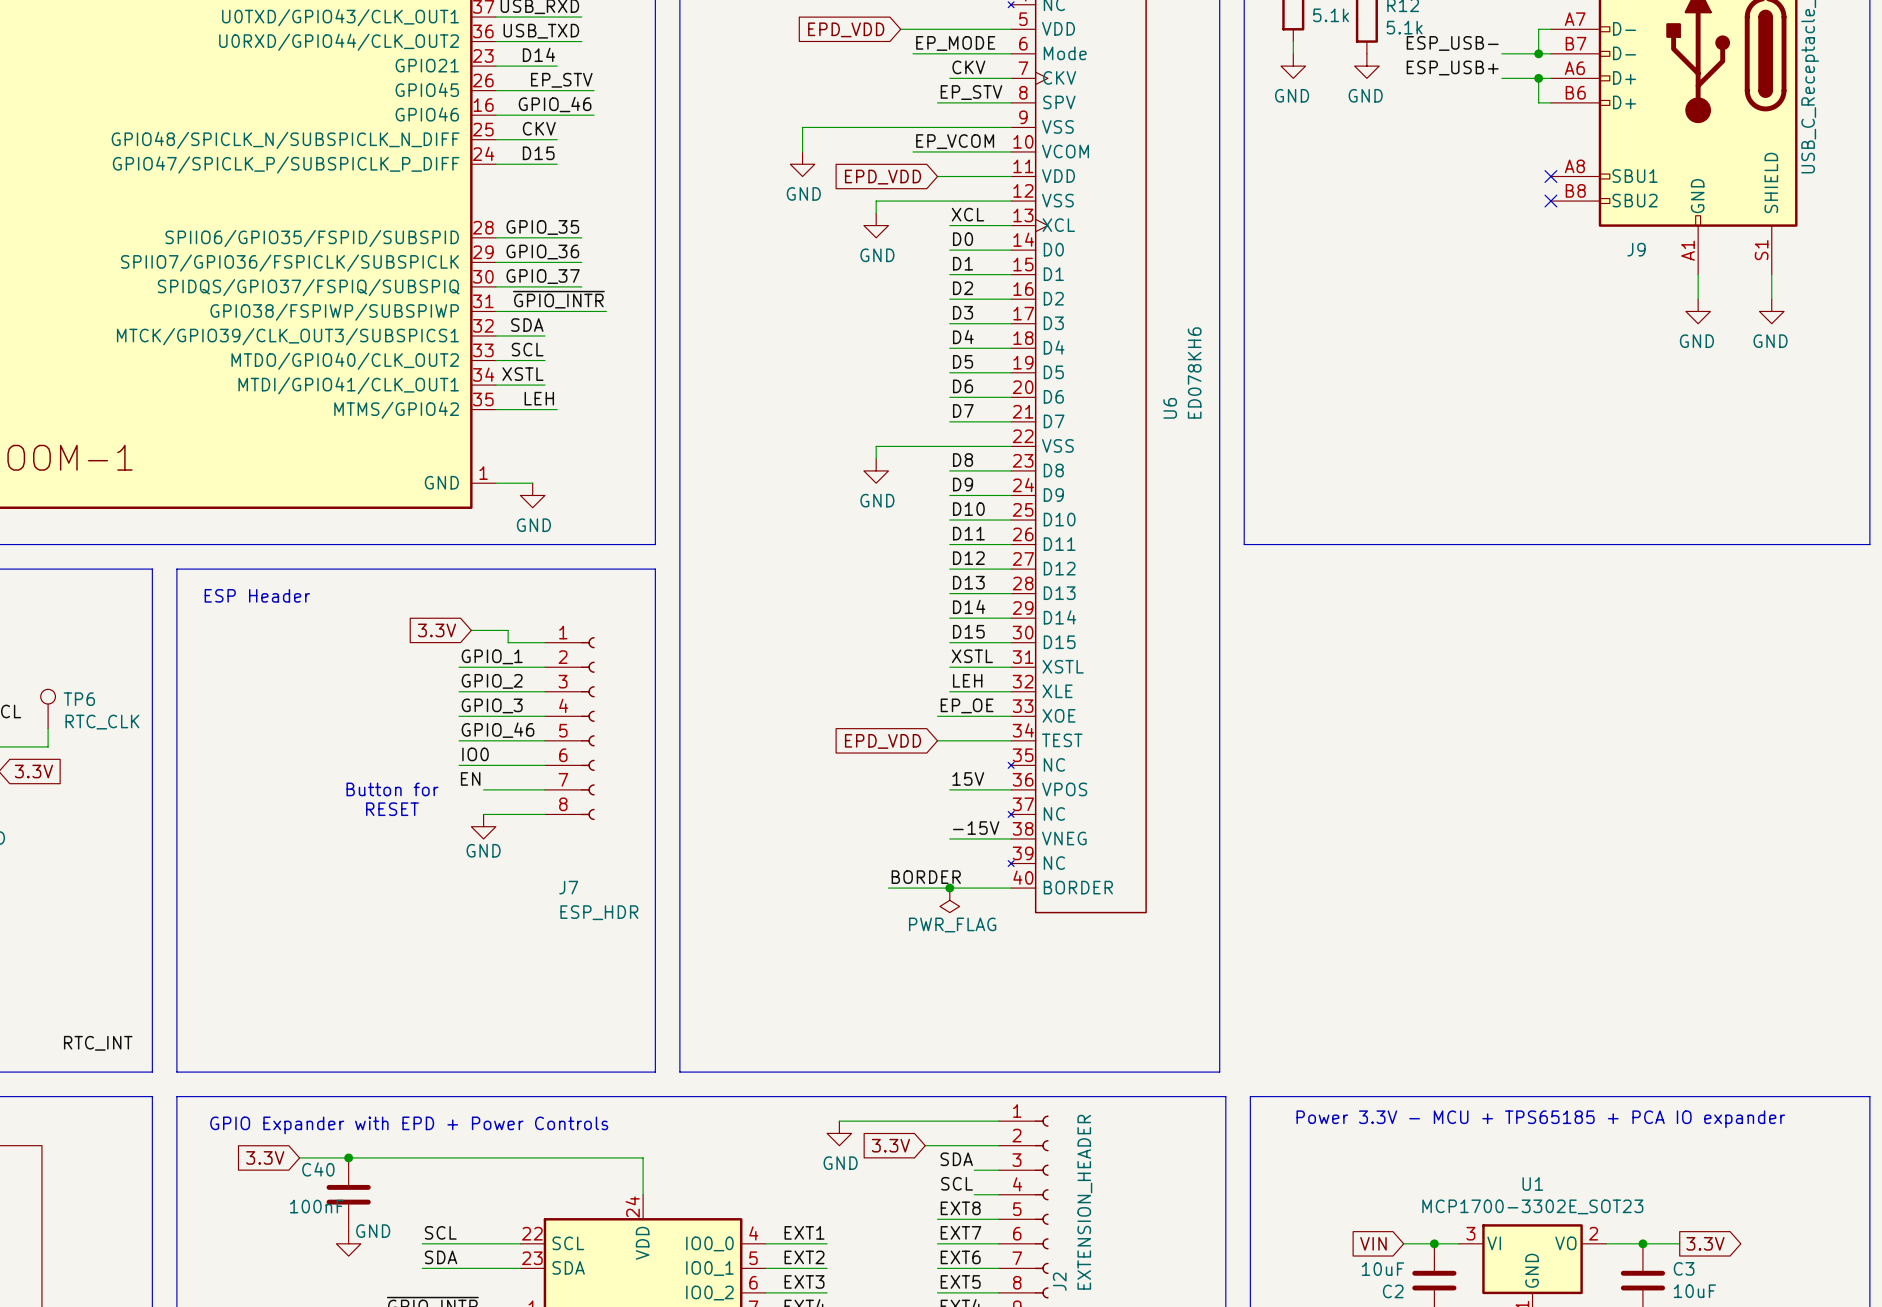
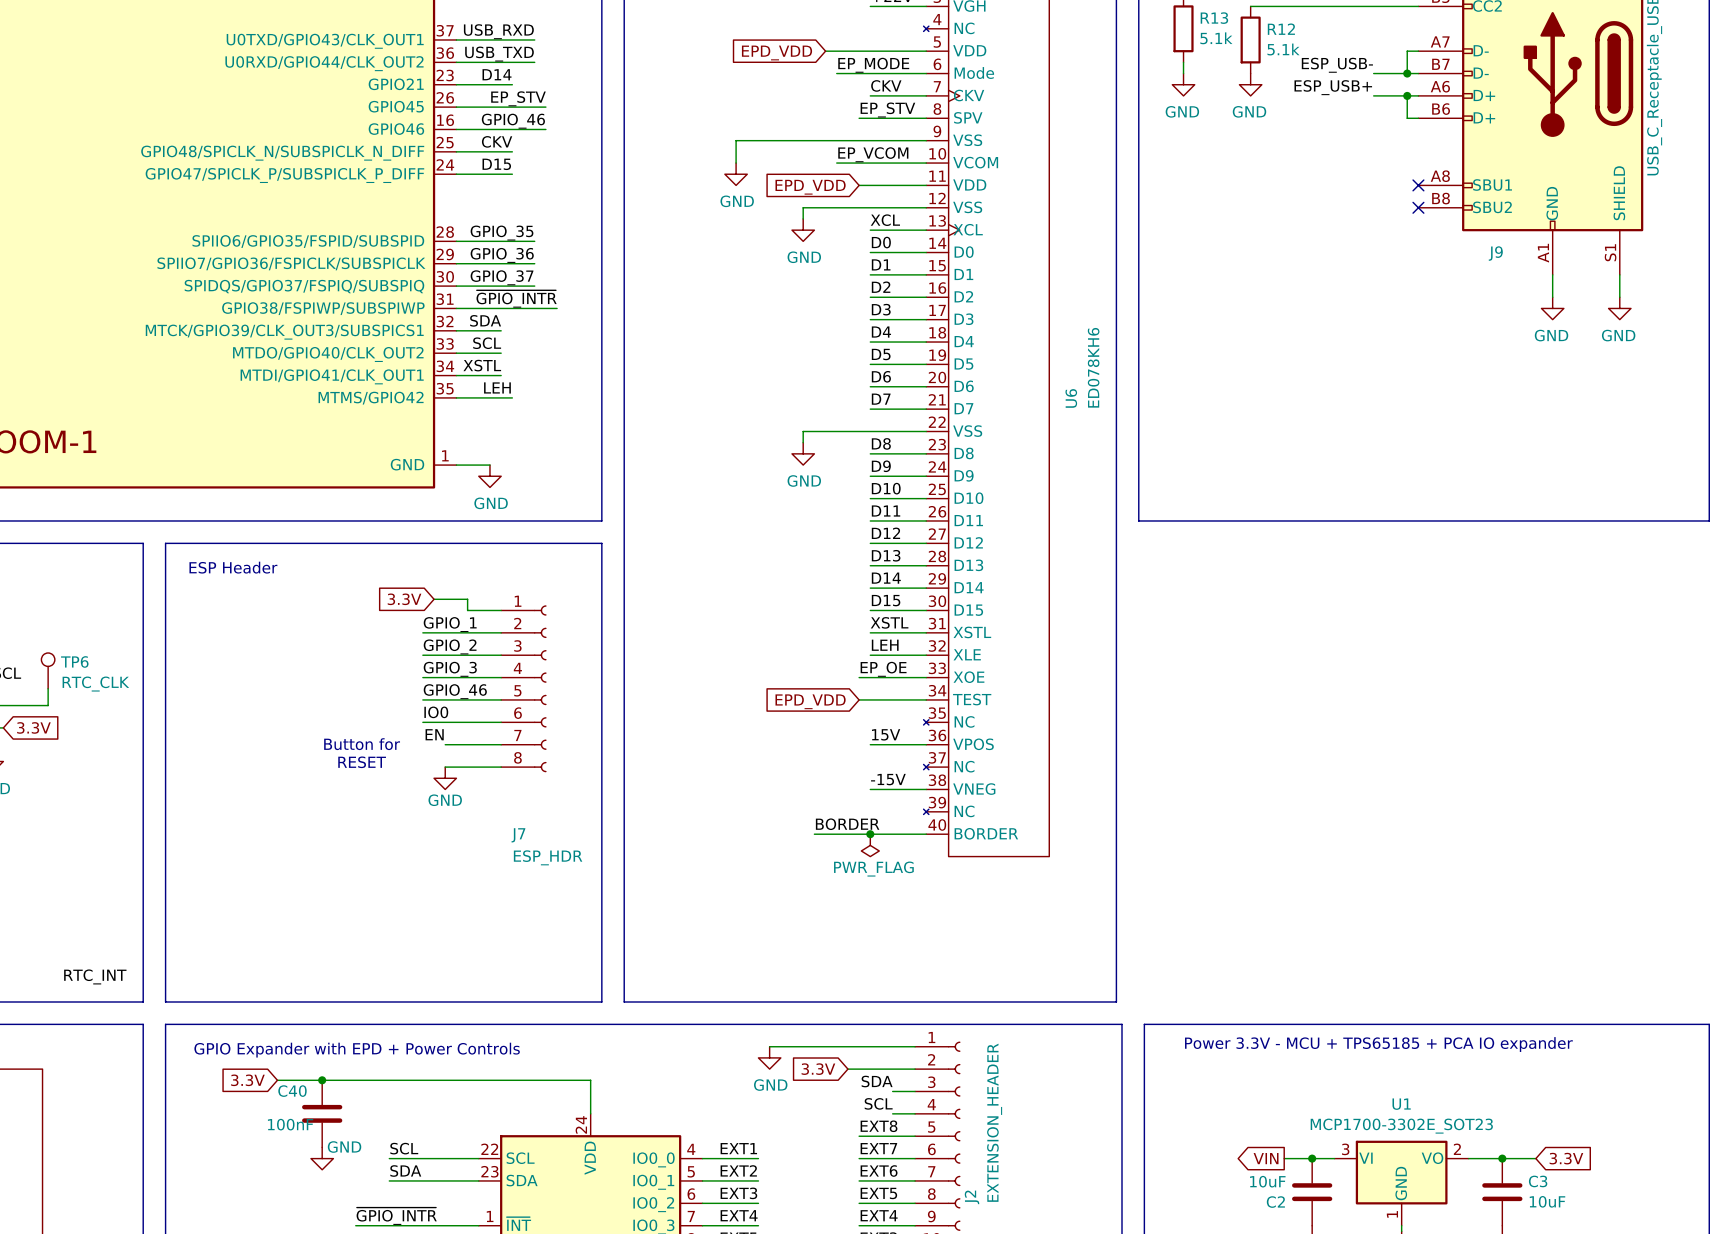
global label shape: input (1373, 1243) -> output (1266, 1158)
global label shape: output (1705, 1243) -> input (1566, 1158)

